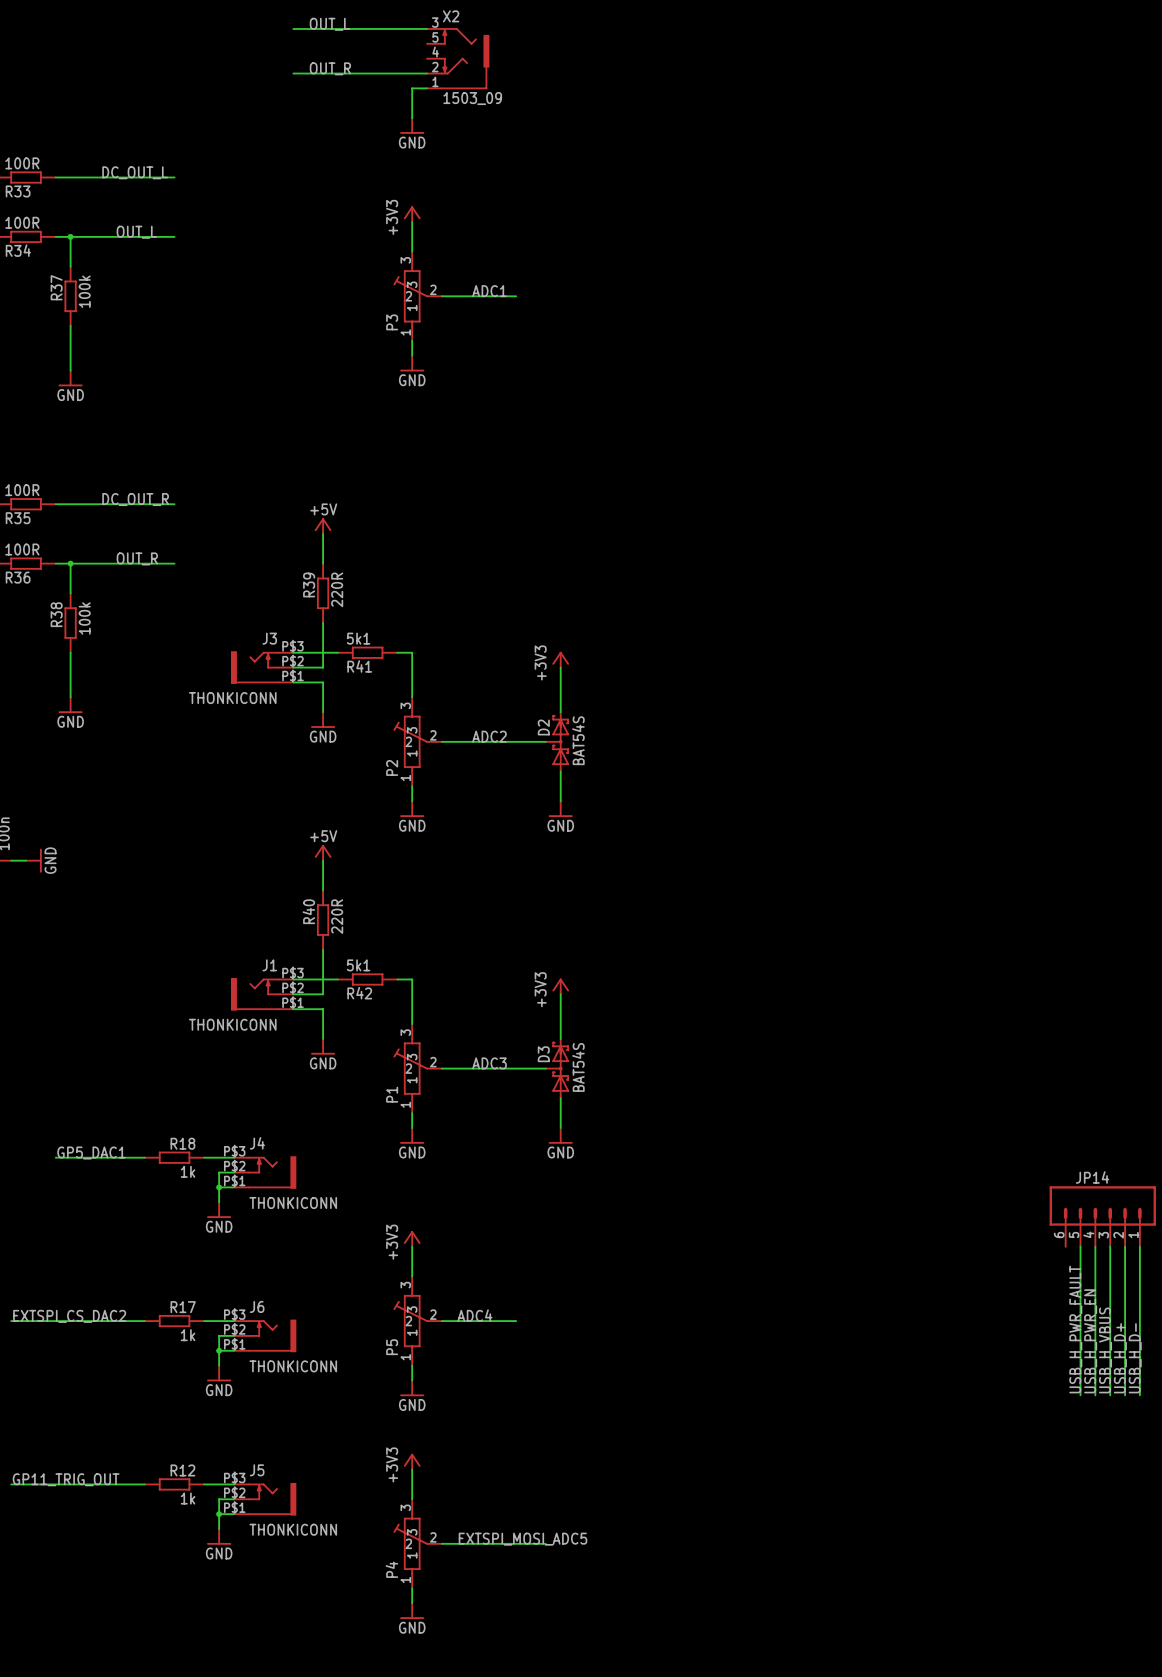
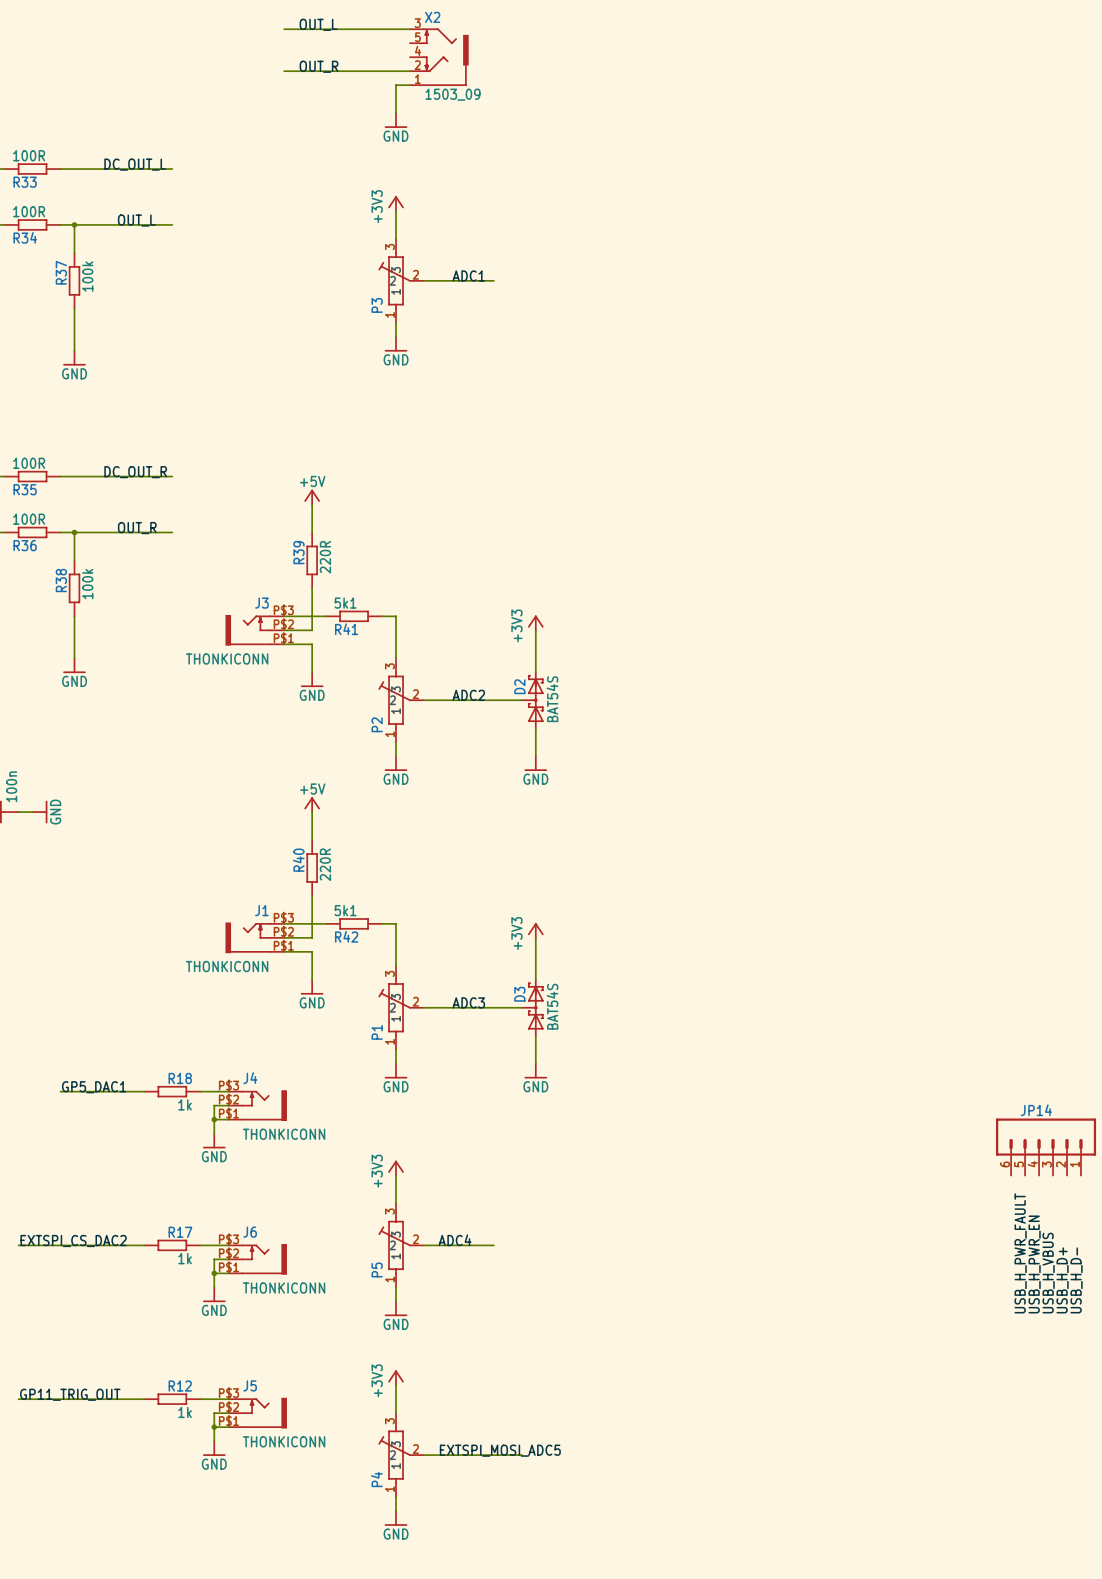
wire: (1080, 1246) (1080, 1395) -> none
wire: (1095, 1246) (1095, 1395) -> none
wire: (1110, 1246) (1110, 1395) -> none
wire: (1125, 1246) (1125, 1395) -> none
wire: (1139, 1246) (1139, 1395) -> none

